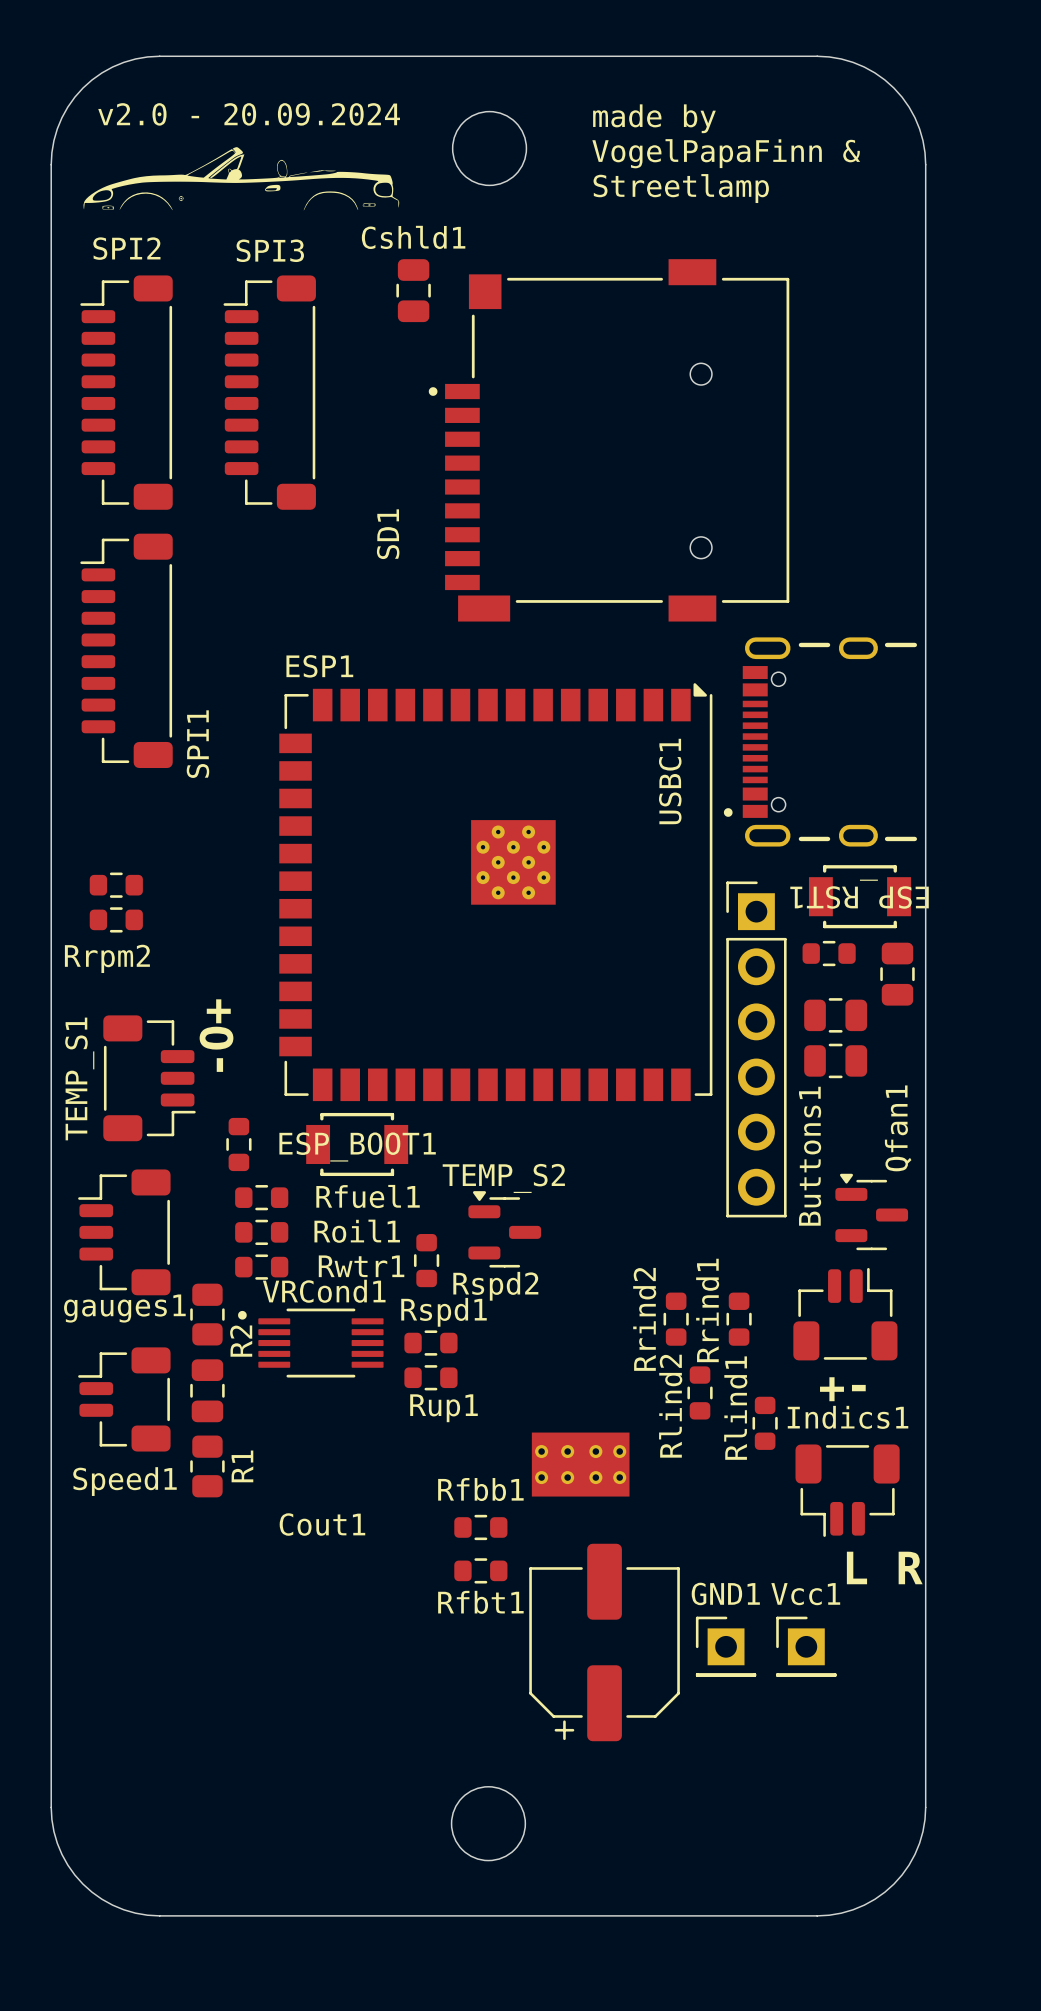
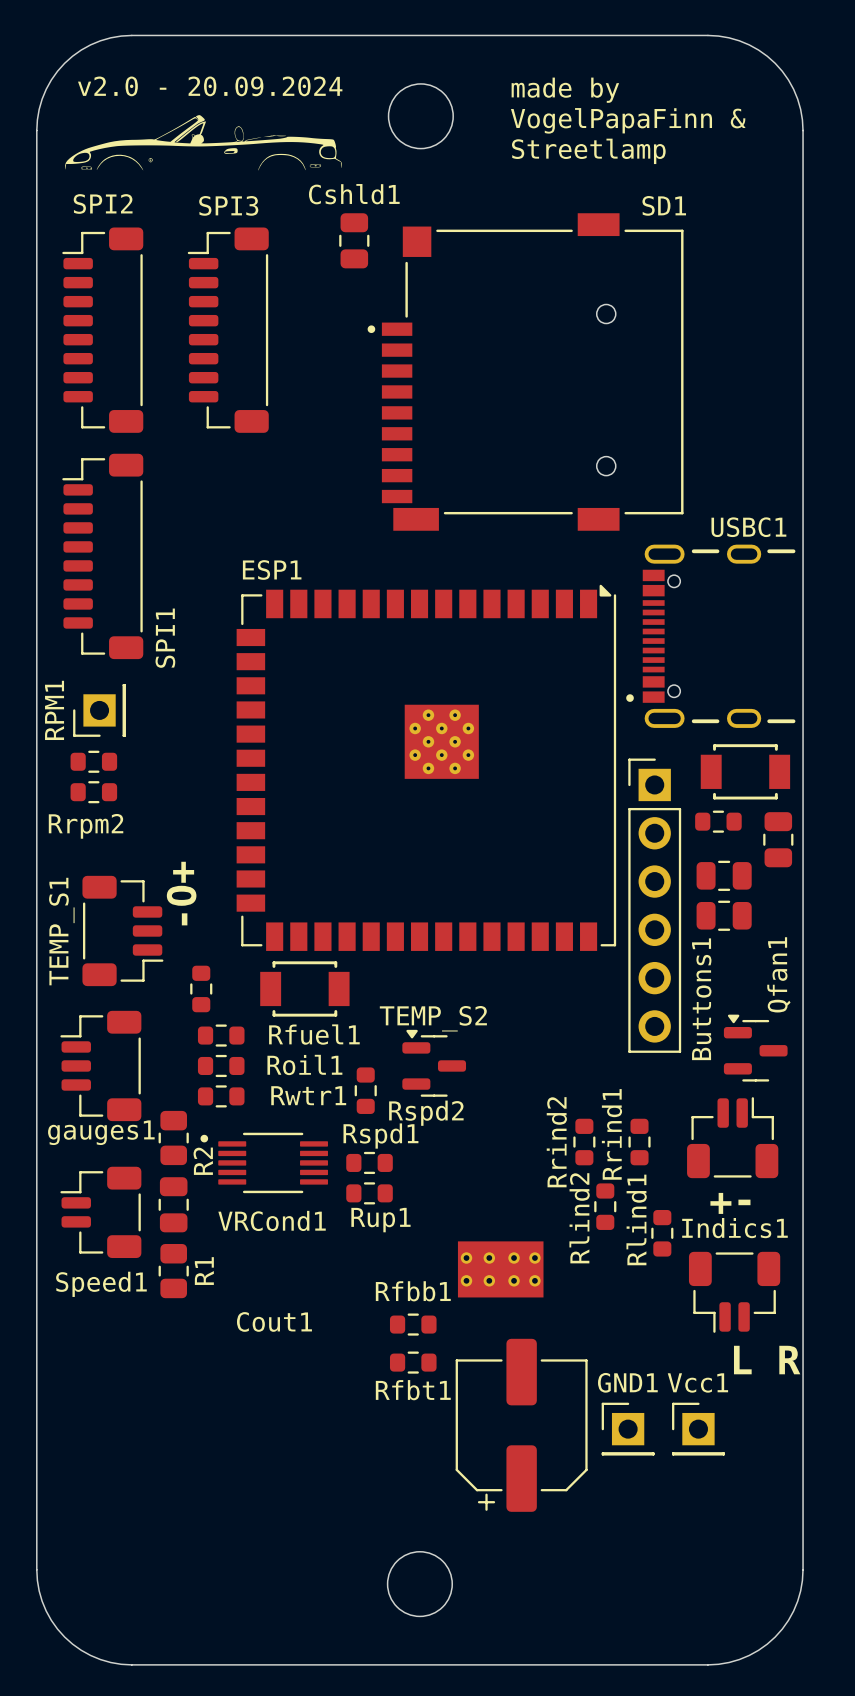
SD1 name rotation: 0° (388, 534) -> 90° clockwise (664, 205)
SD1 name position: SD1 (388, 534) -> SD1 (664, 205)
USBC1 name rotation: 0° (670, 781) -> 90° clockwise (748, 527)
USBC1 name position: USBC1 (670, 781) -> USBC1 (748, 527)
RPM1: none -> (99, 710)
ESP_RST1 name: ESP_RST1 (859, 894) -> none
ESP_BOOT1 name: ESP_BOOT1 (357, 1146) -> none
VRCond1 name position: VRCond1 (324, 1291) -> VRCond1 (272, 1220)

